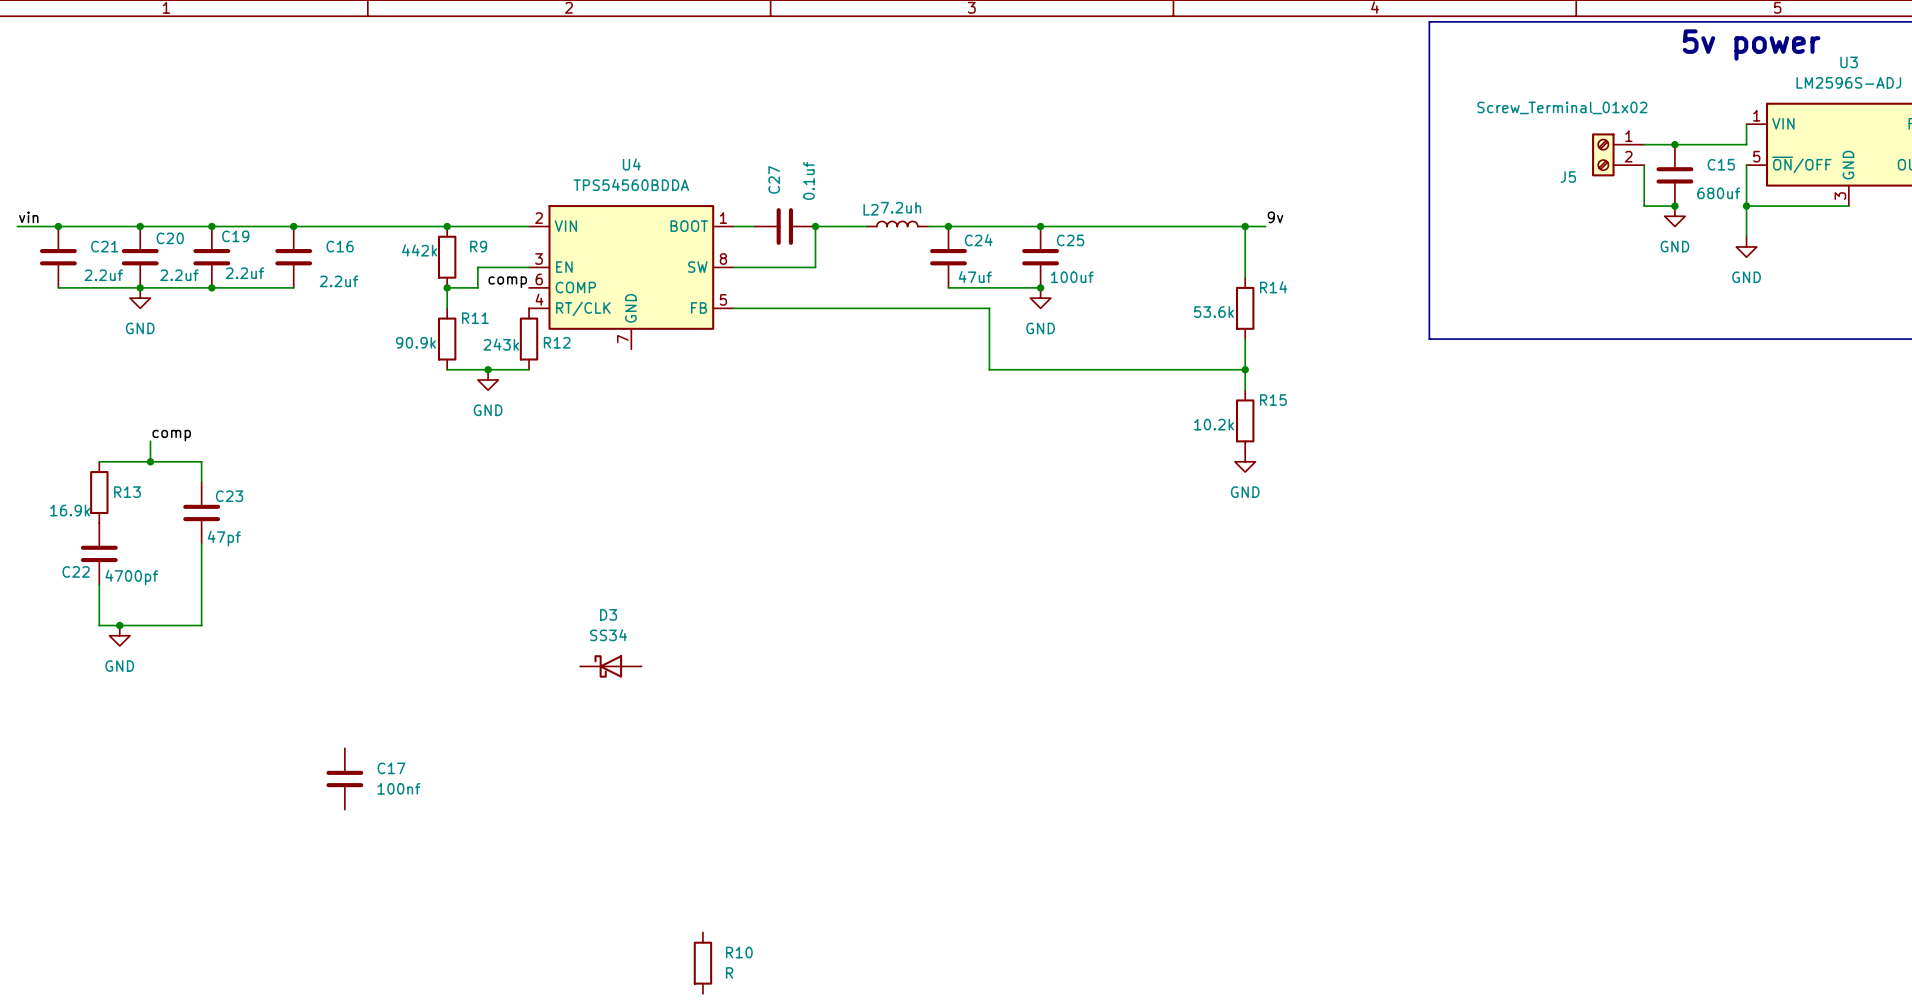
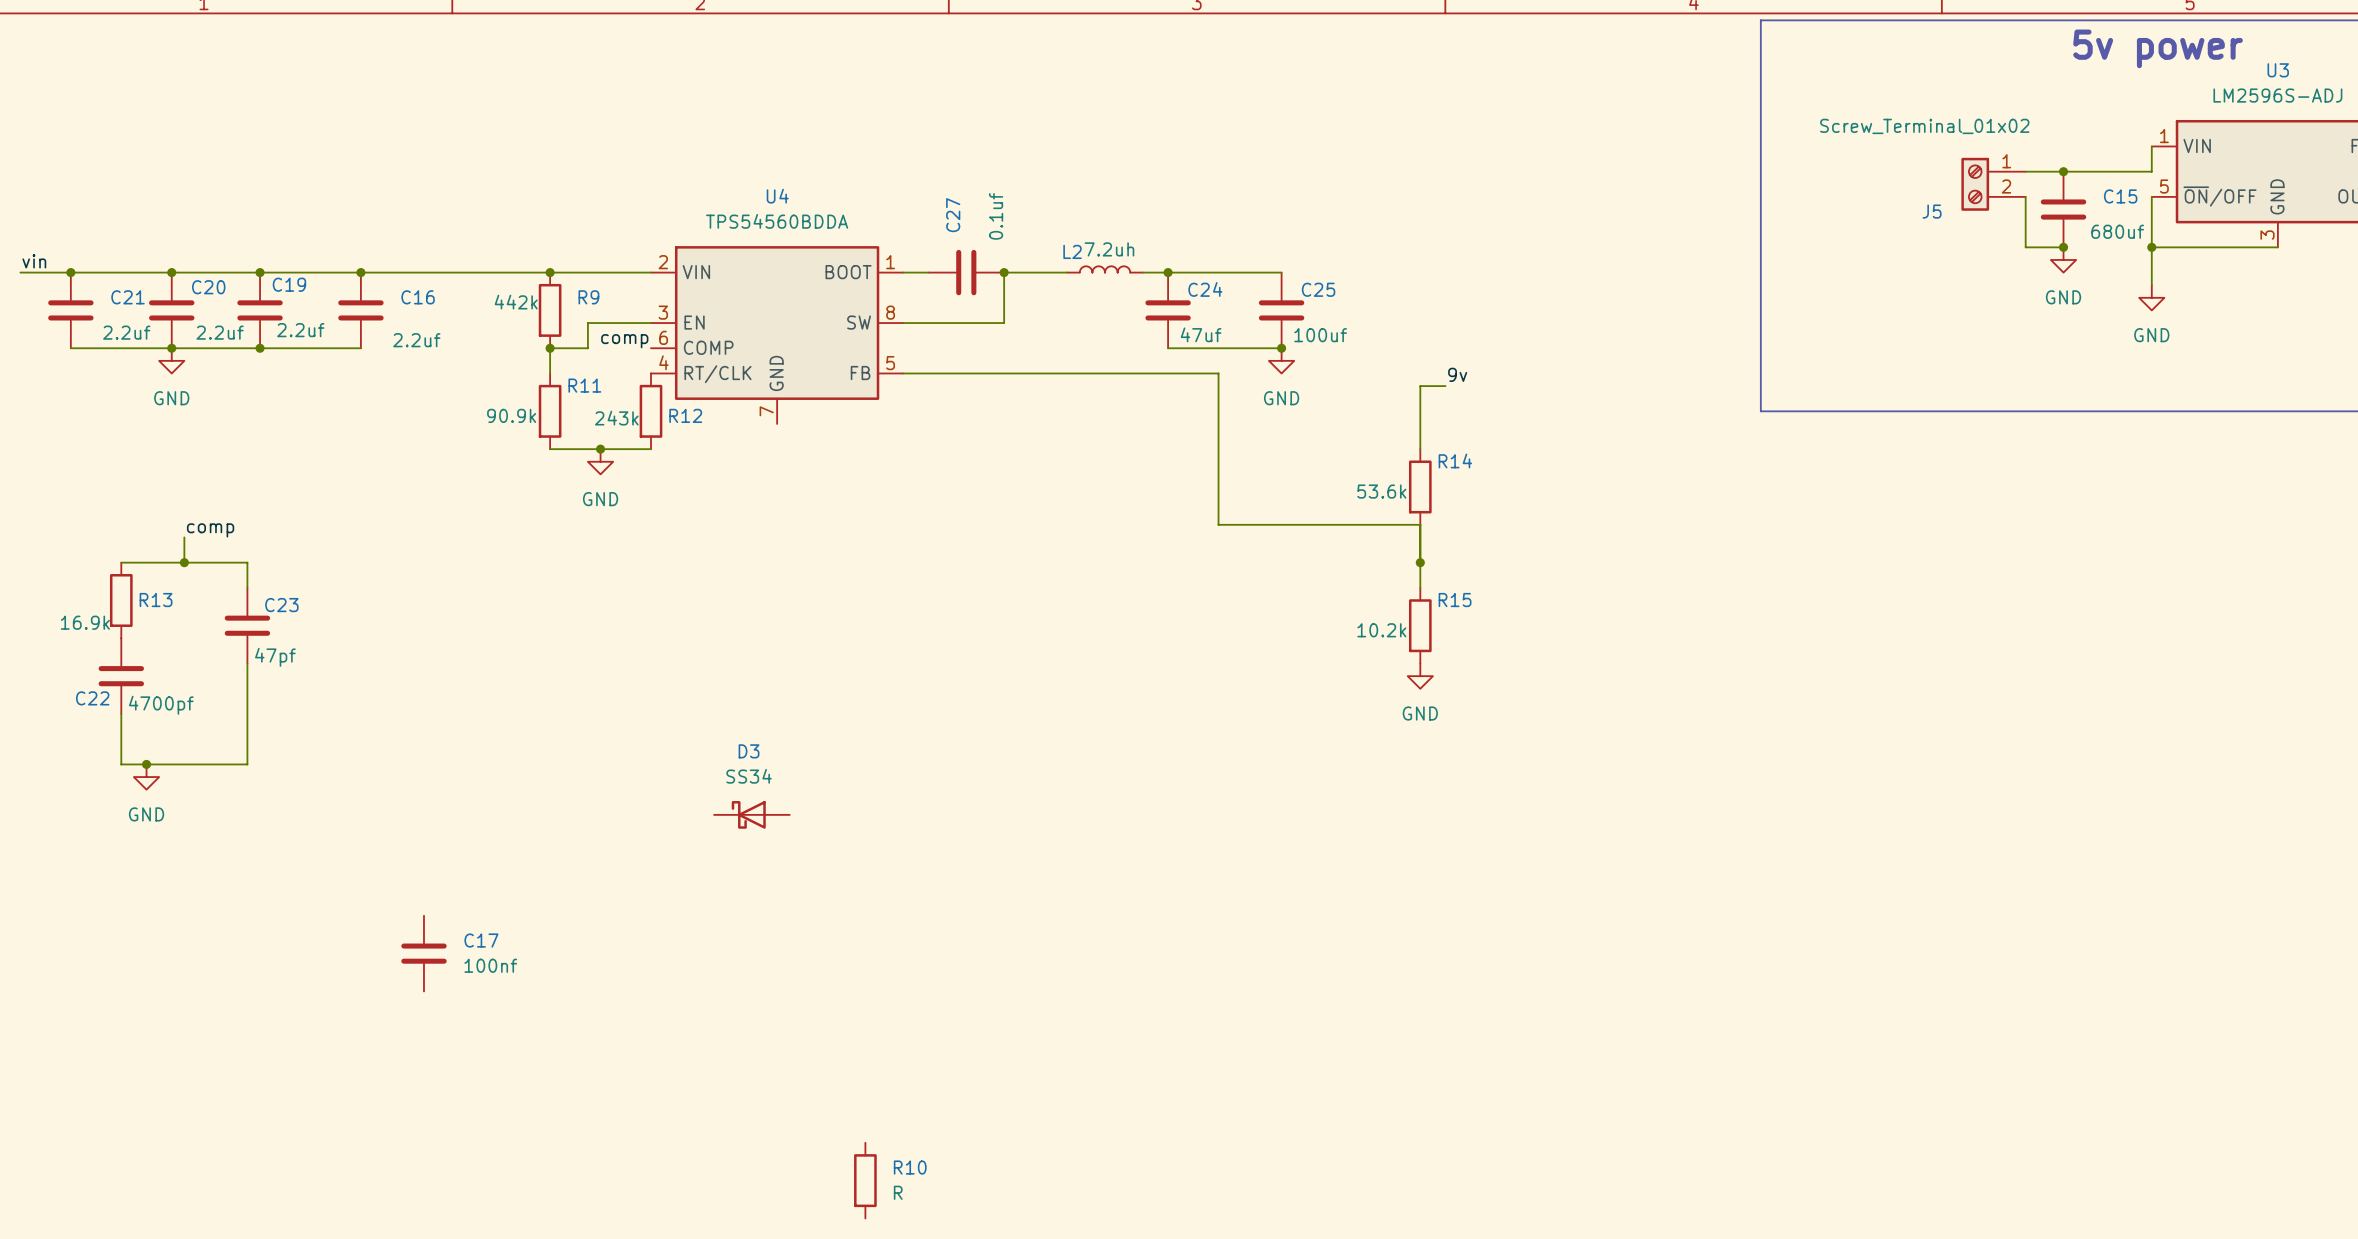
label position: 9v (1275, 217) -> 9v (1457, 374)
wire: (1040, 226) (1265, 226) -> none
junction: (1040, 226) -> none
wire: (1245, 226) (1245, 277) -> none
junction: (1245, 226) -> none
R14 position: (1245, 308) -> (1420, 486)
wire: none -> (1445, 386) (1420, 386) (1420, 449)
wire: (1245, 339) (1245, 390) -> none
wire: (989, 369) (1245, 369) -> (1218, 449) (1218, 524) (1420, 524) (1420, 587)
junction: (1245, 369) -> none
R15 position: (1245, 420) -> (1420, 625)
junction: none -> (1420, 562)
power symbol position: GND (1245, 461) -> GND (1420, 676)

